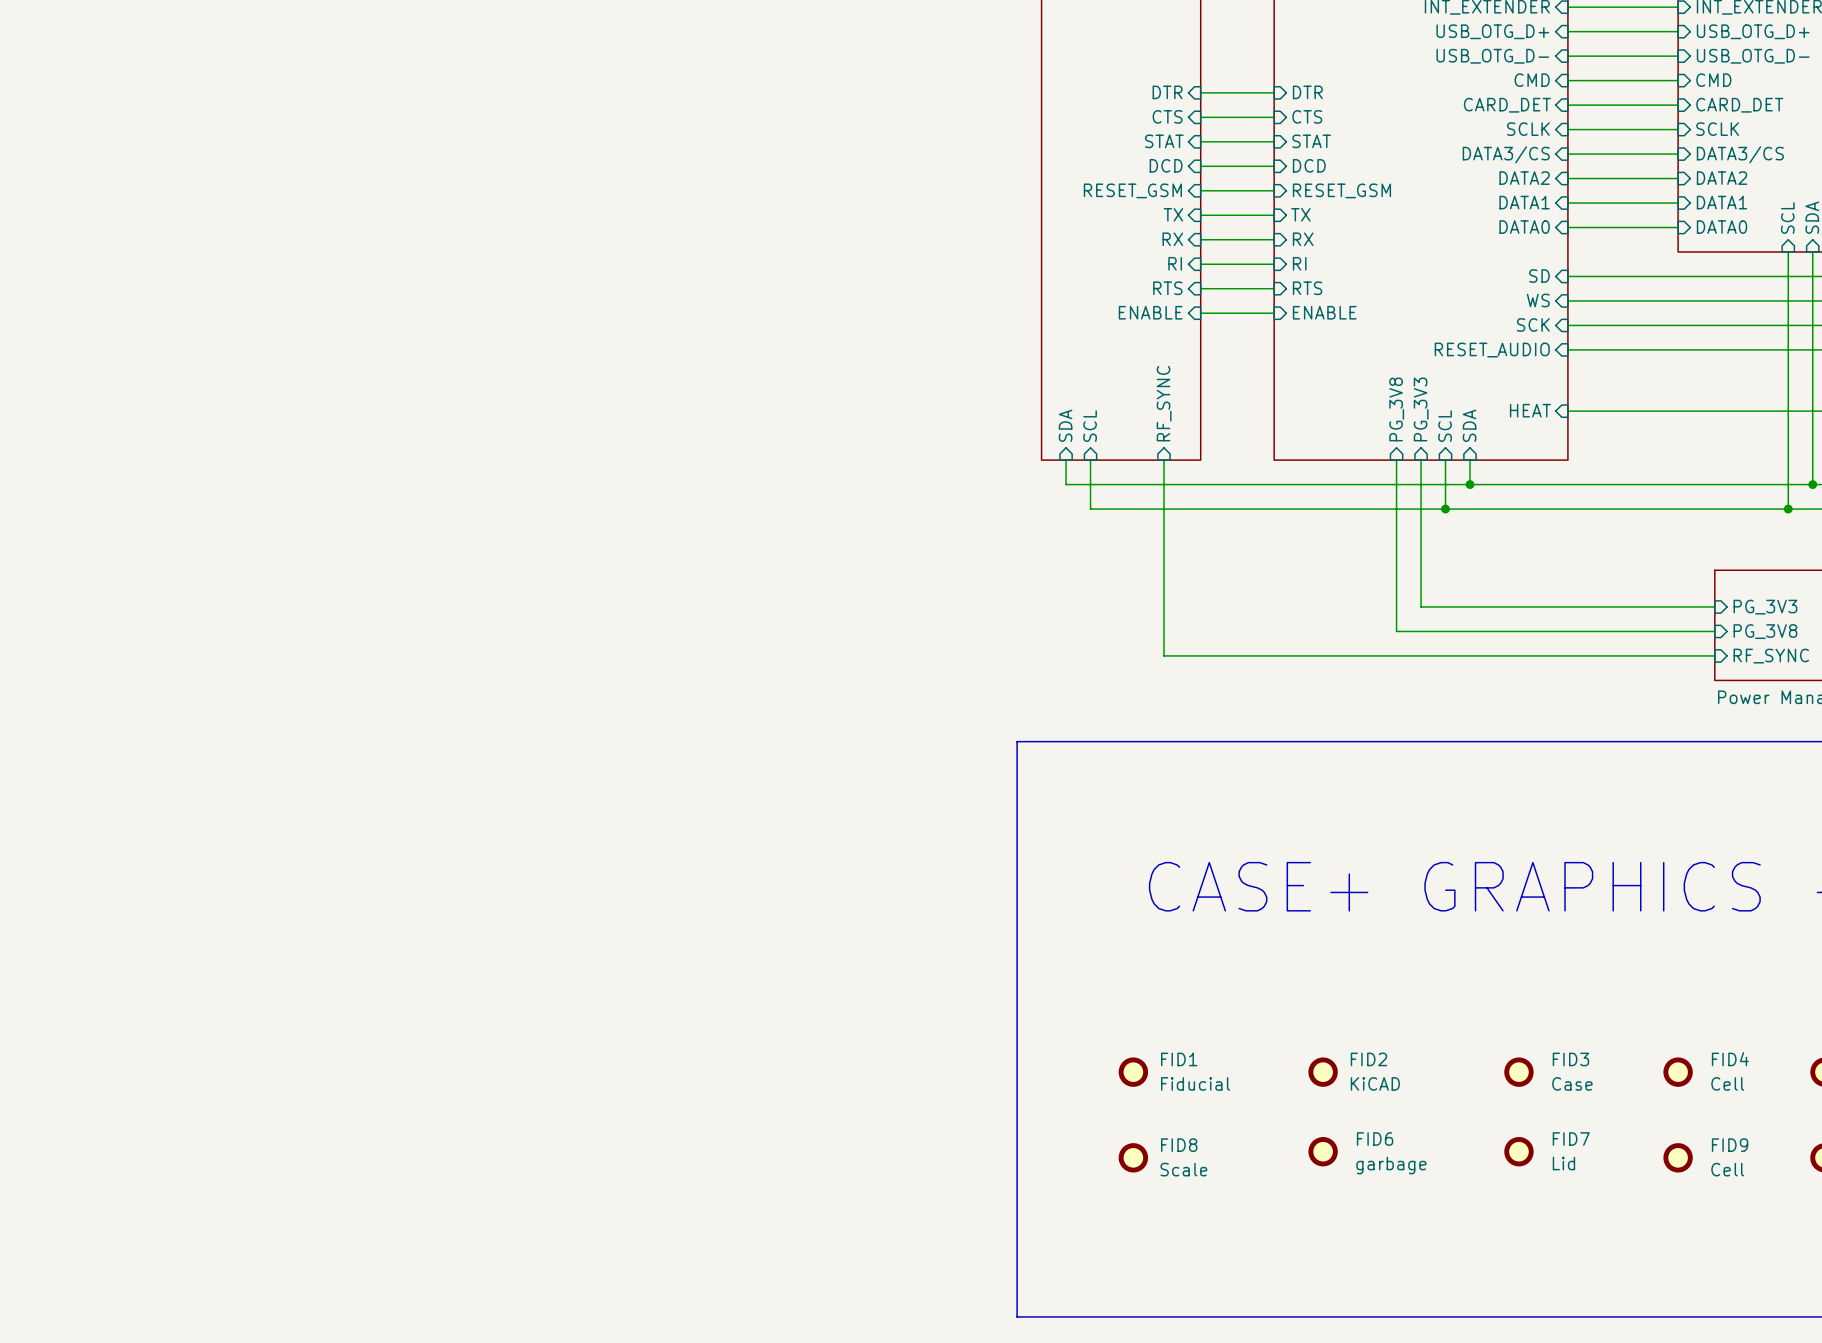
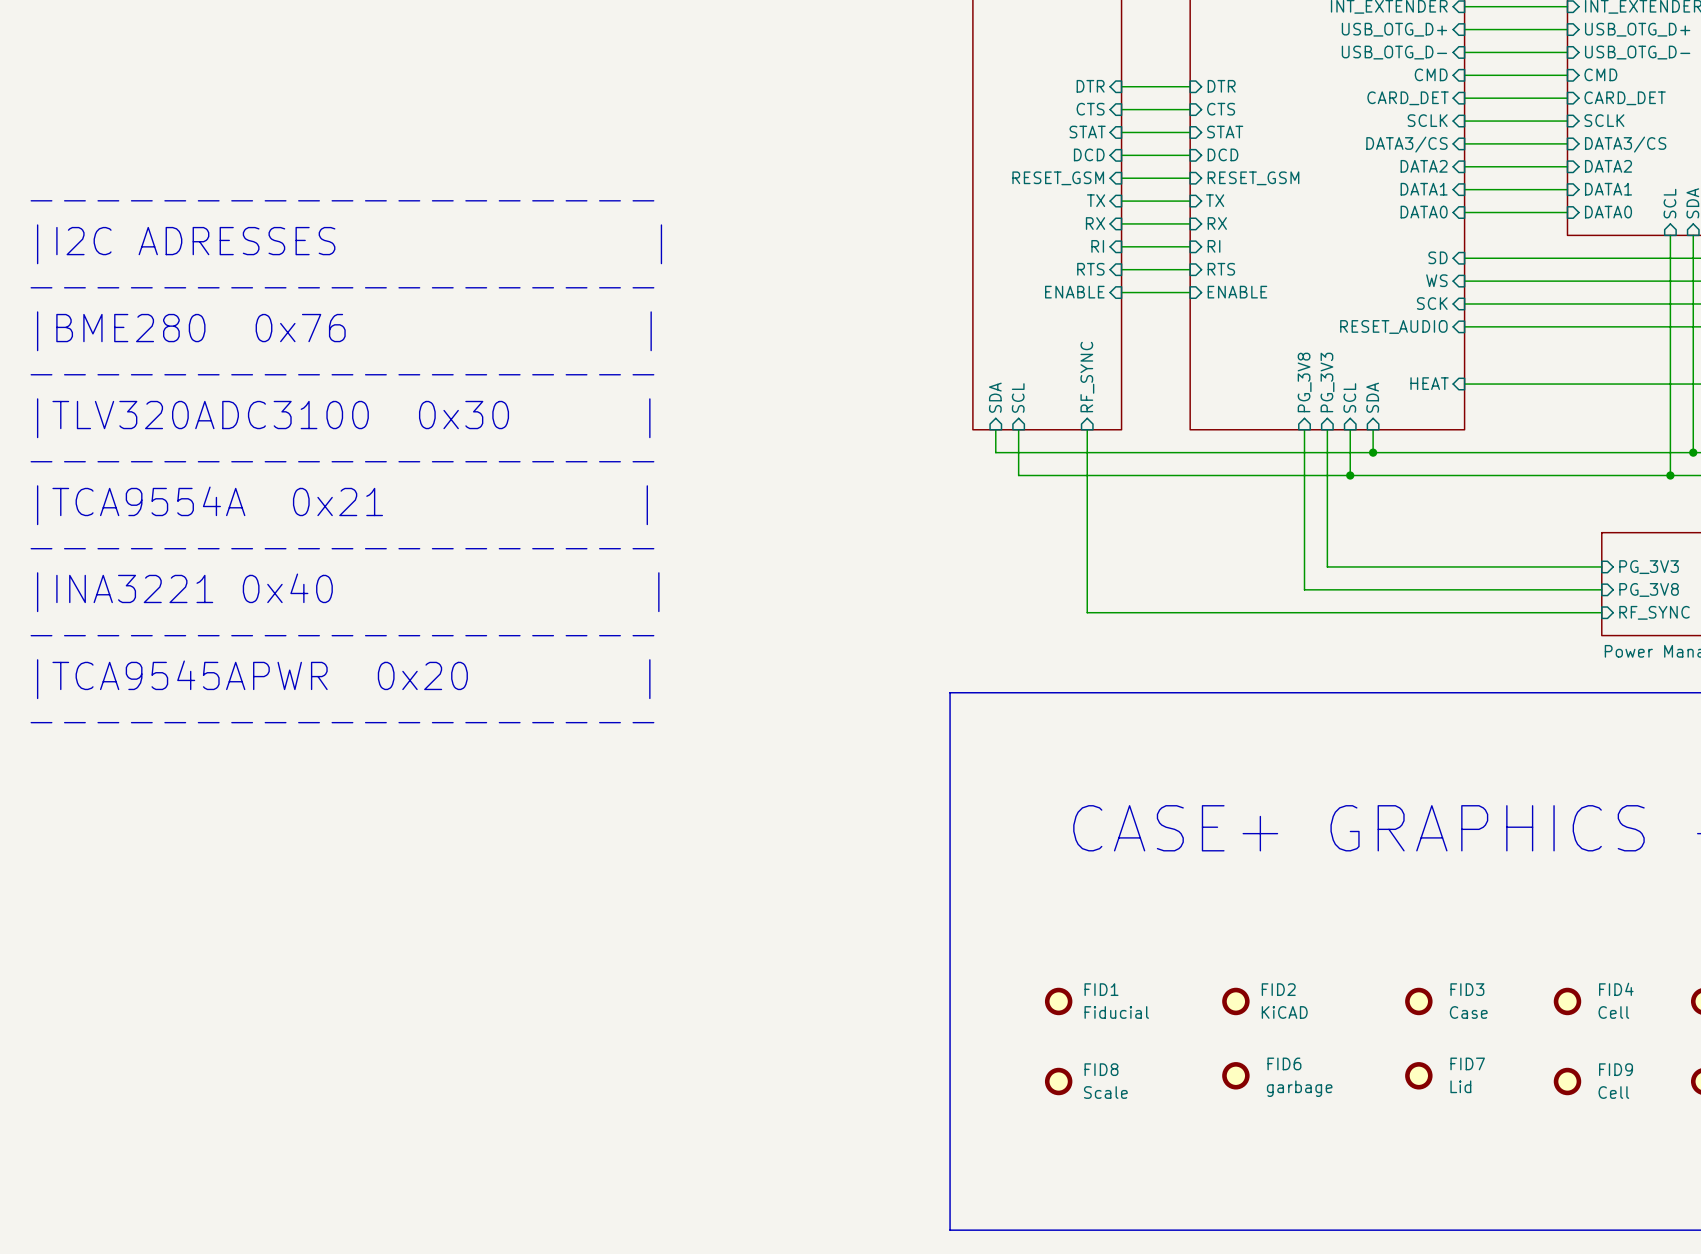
text: none -> ------------------- (342, 200)
text: none -> |I2C ADRESSES | (349, 244)
text: none -> ------------------- (342, 287)
text: none -> |BME280 0x76 | (344, 331)
text: none -> ------------------- (342, 374)
text: none -> |TLV320ADC3100 0x30 | (343, 418)
text: none -> ------------------- (342, 461)
text: none -> |TCA9554A 0x21 | (342, 505)
text: none -> ------------------- (342, 548)
text: none -> |INA3221 0x40 | (348, 592)
text: none -> ------------------- (342, 635)
text: none -> |TCA9545APWR 0x20 | (343, 679)
text: none -> ------------------- (342, 722)

